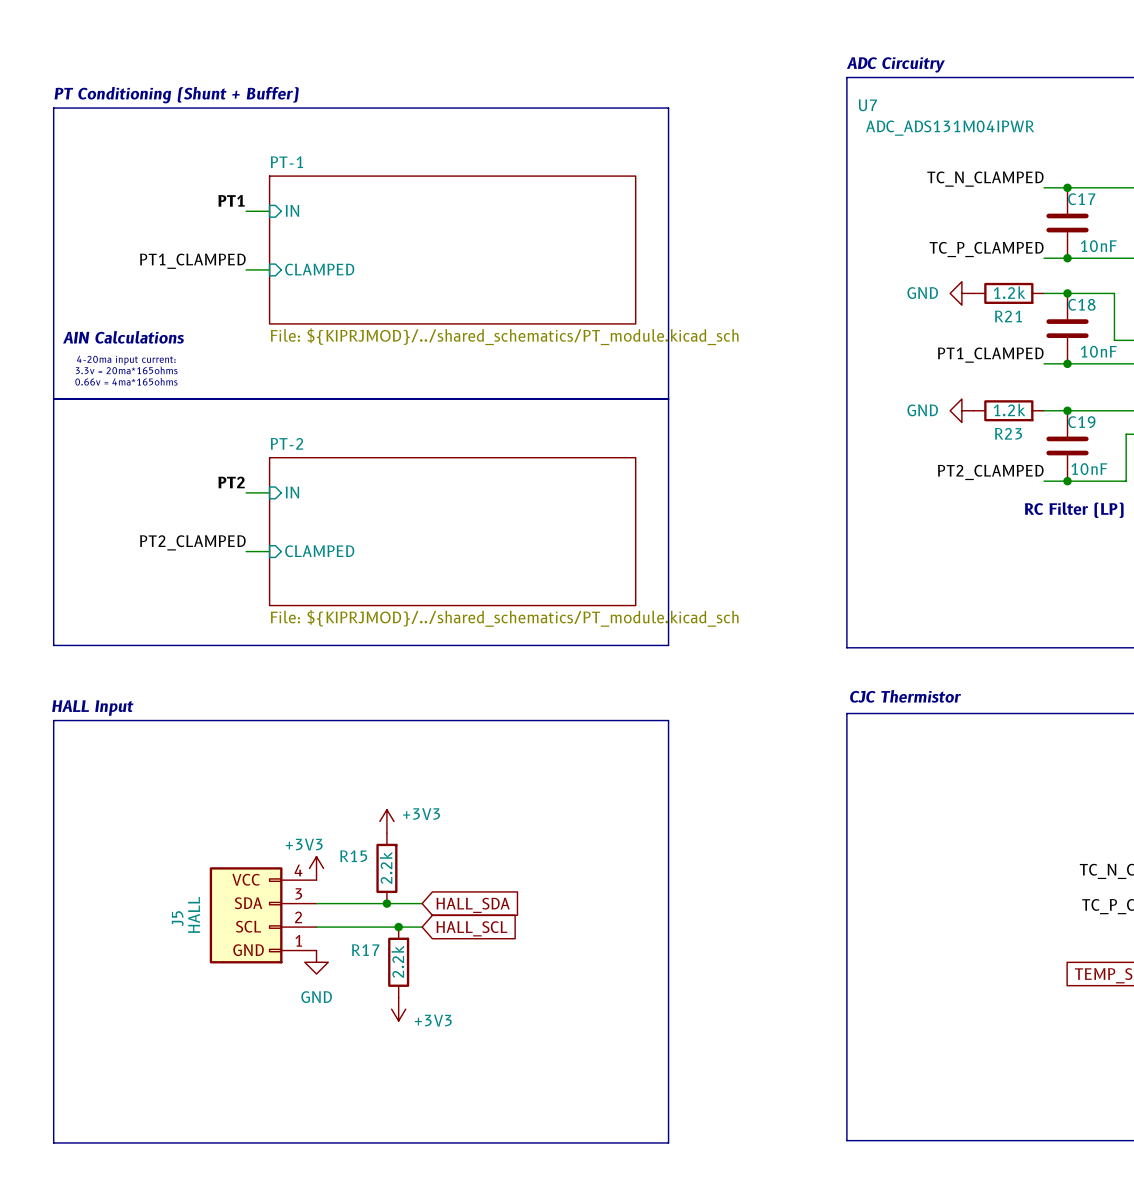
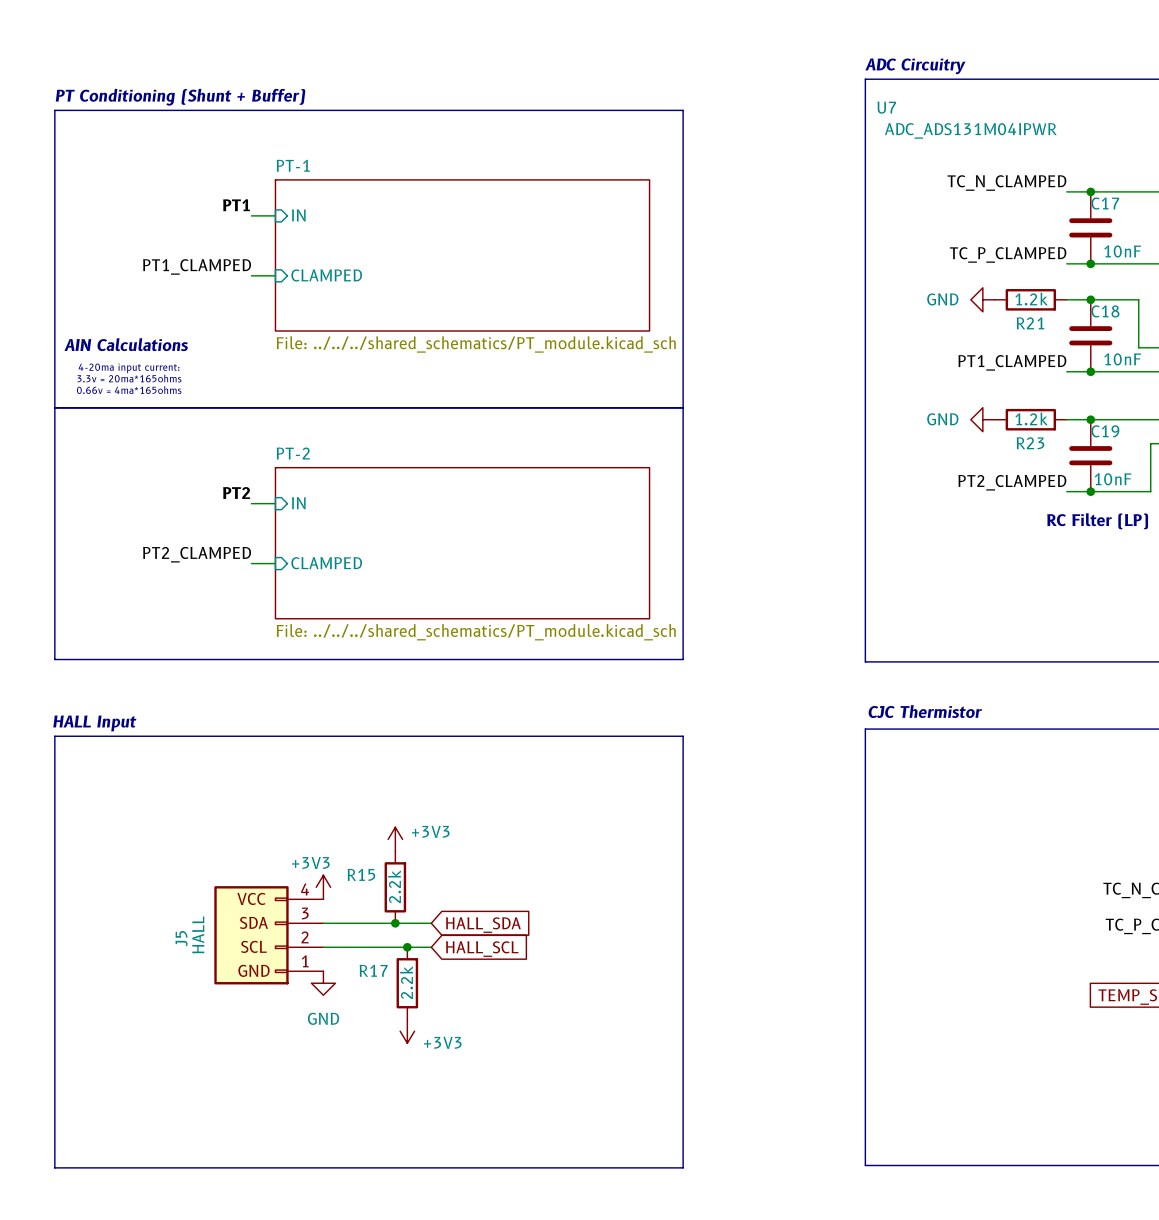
sheet PT-1 value: File: ${KIPRJMOD}/../shared_schematics/PT_module.kicad_sch (504, 336) -> File: ../../../shared_schematics/PT_module.kicad_sch (476, 344)
sheet PT-2 value: File: ${KIPRJMOD}/../shared_schematics/PT_module.kicad_sch (504, 618) -> File: ../../../shared_schematics/PT_module.kicad_sch (476, 632)

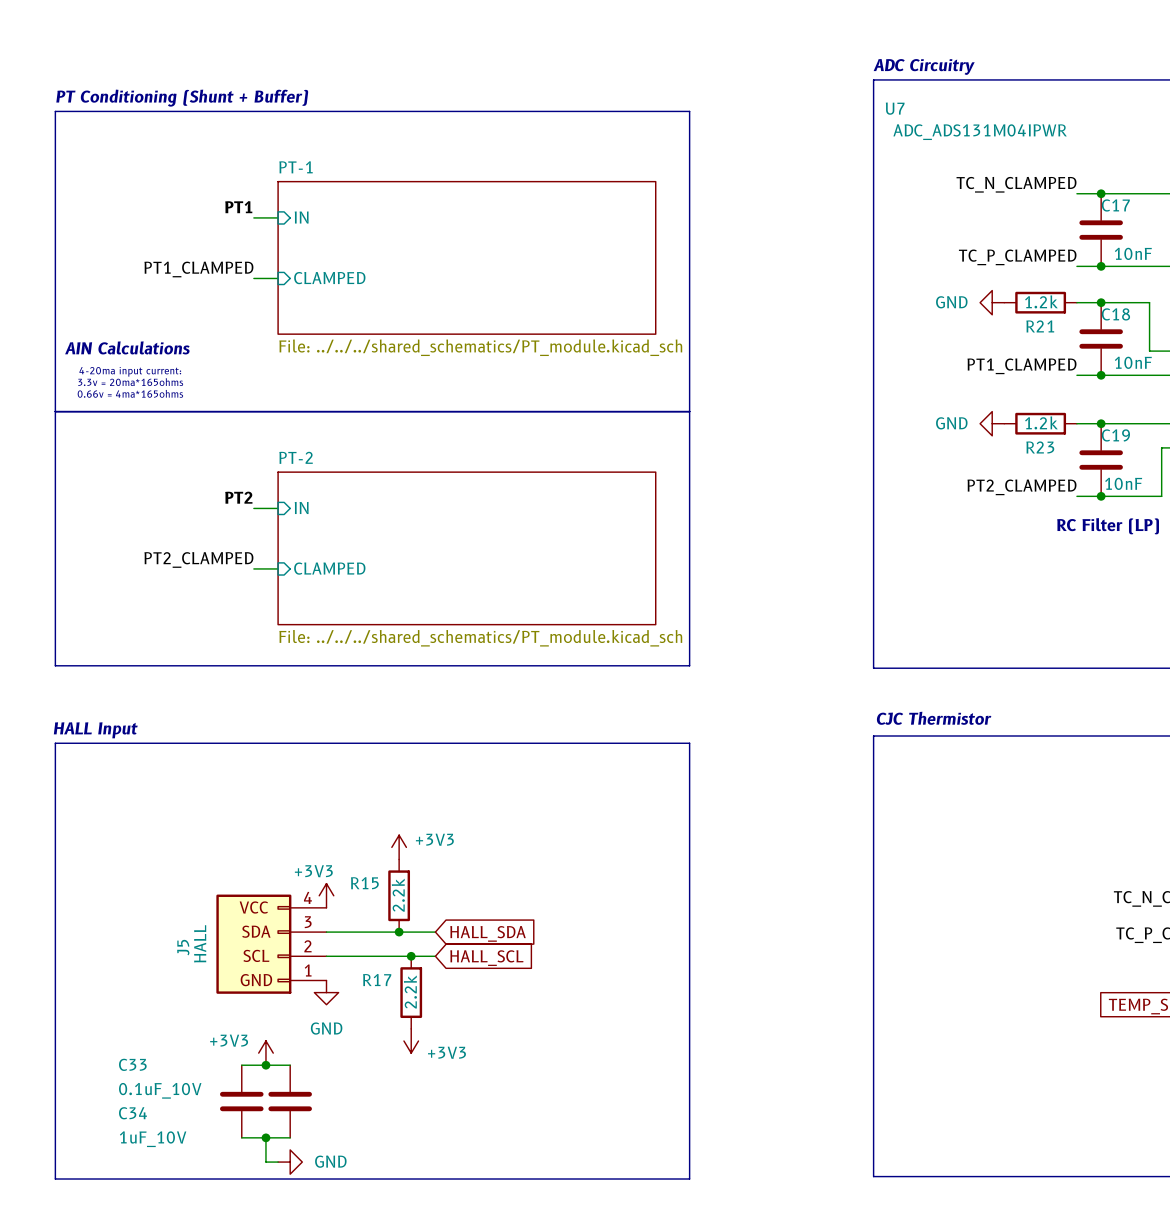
power symbol: none -> +3V3 (265, 1053)
wire: none -> (241, 1065) (290, 1065)
junction: none -> (265, 1065)
C33: none -> 0.1uF_10V (241, 1101)
C34: none -> 1uF_10V (290, 1101)
wire: none -> (241, 1137) (290, 1137)
wire: none -> (265, 1137) (265, 1162) (278, 1162)
junction: none -> (265, 1137)
power symbol: none -> GND (290, 1162)

